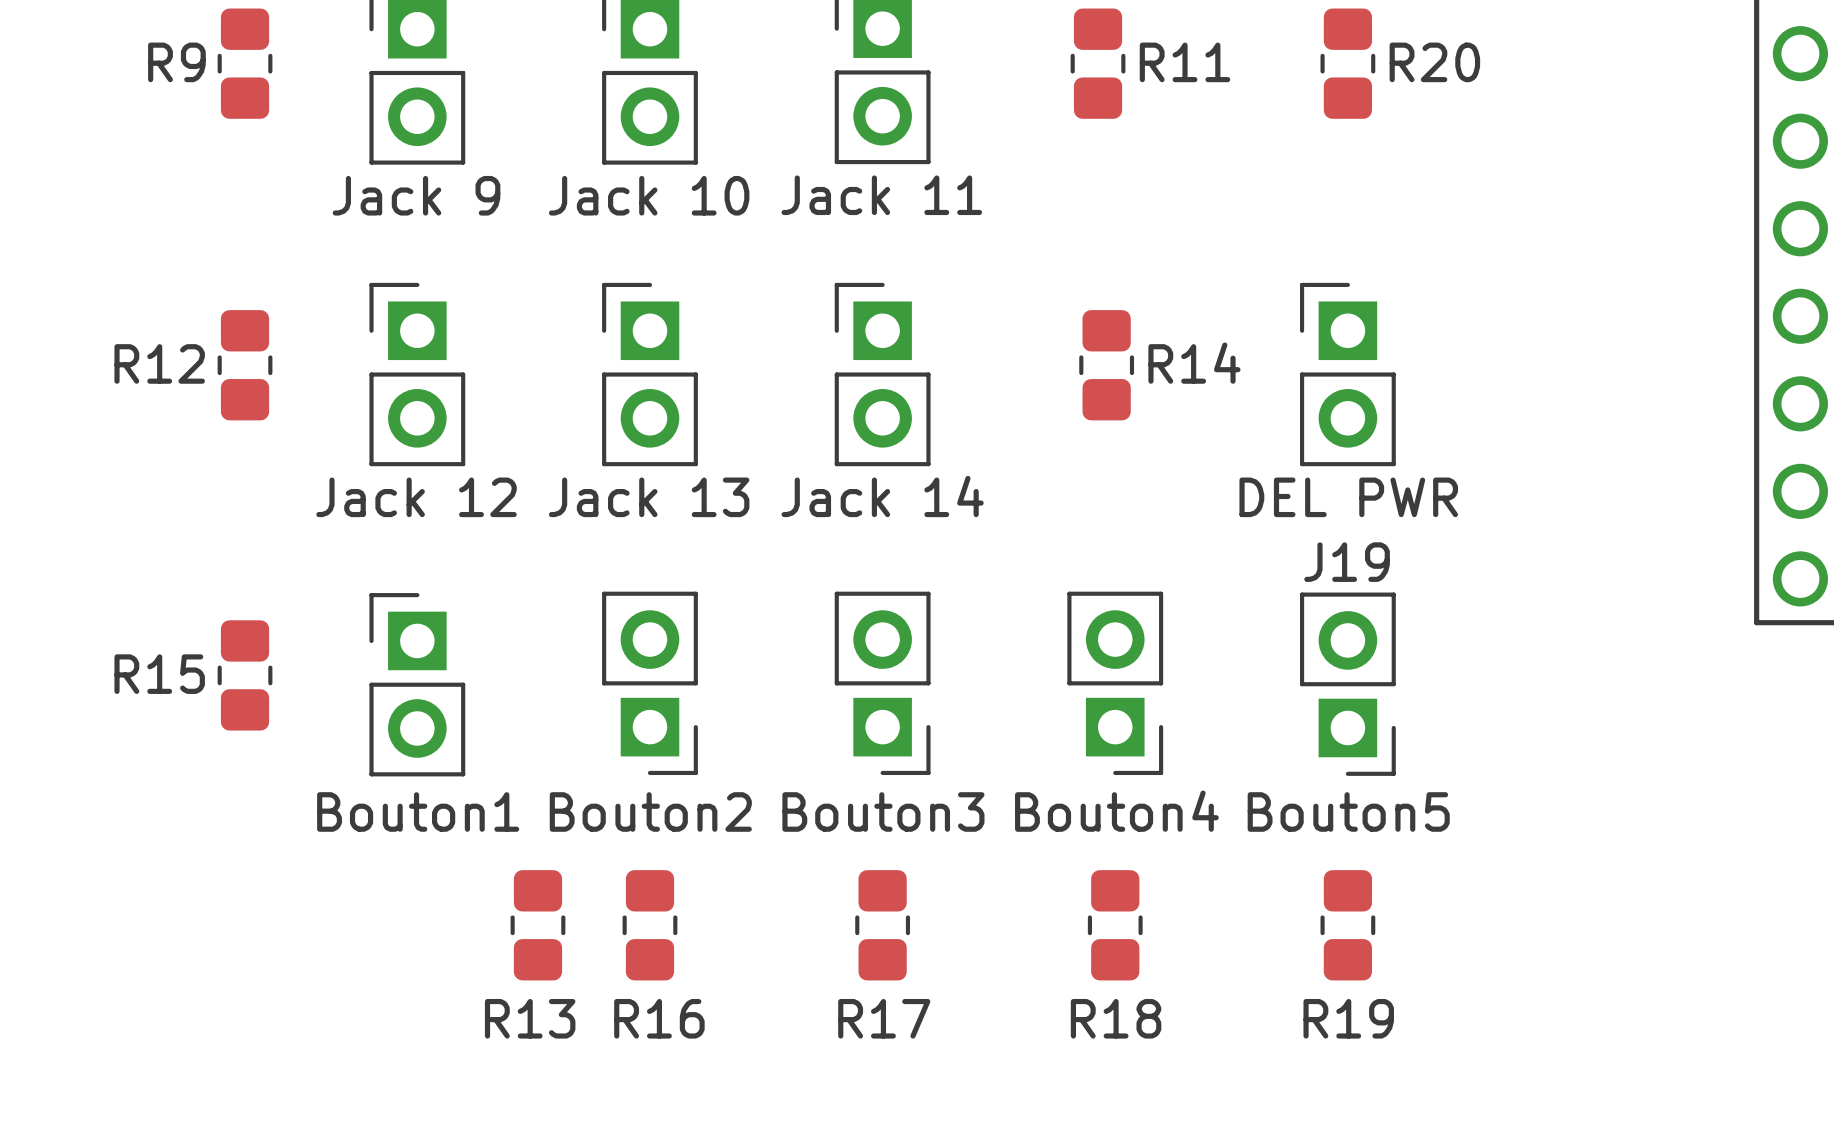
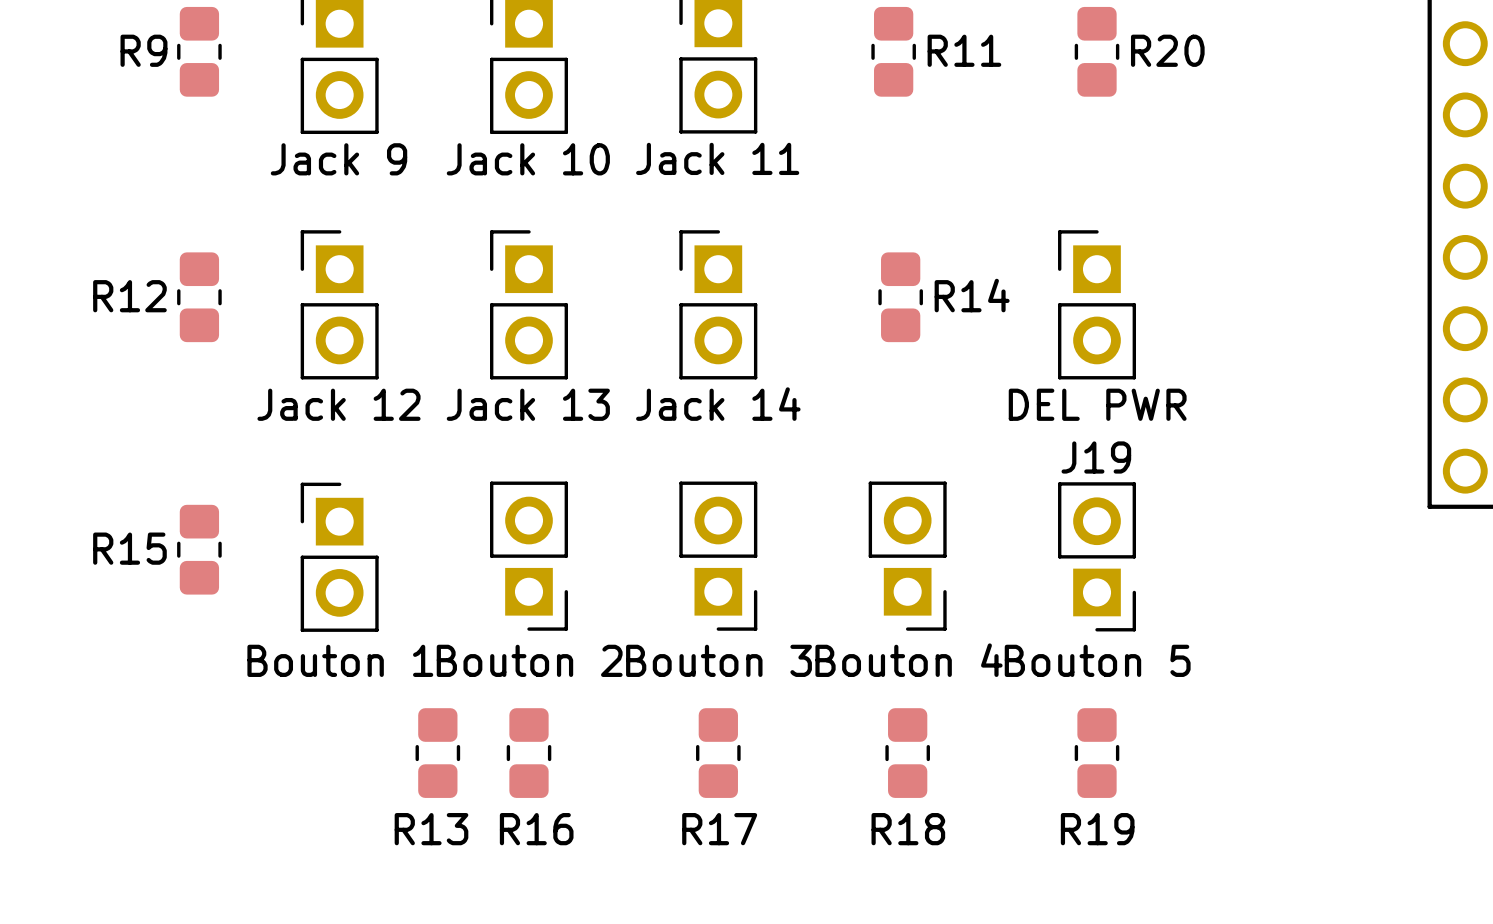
part value: Bouton1 (418, 811) -> Bouton 1 (340, 660)
part value: Bouton2 (650, 811) -> Bouton 2 (529, 660)
part value: Bouton3 (883, 811) -> Bouton 3 (719, 660)
part value: Bouton4 (1116, 811) -> Bouton 4 (909, 660)
J19 value: Bouton5 (1348, 811) -> Bouton 5 (1097, 660)

